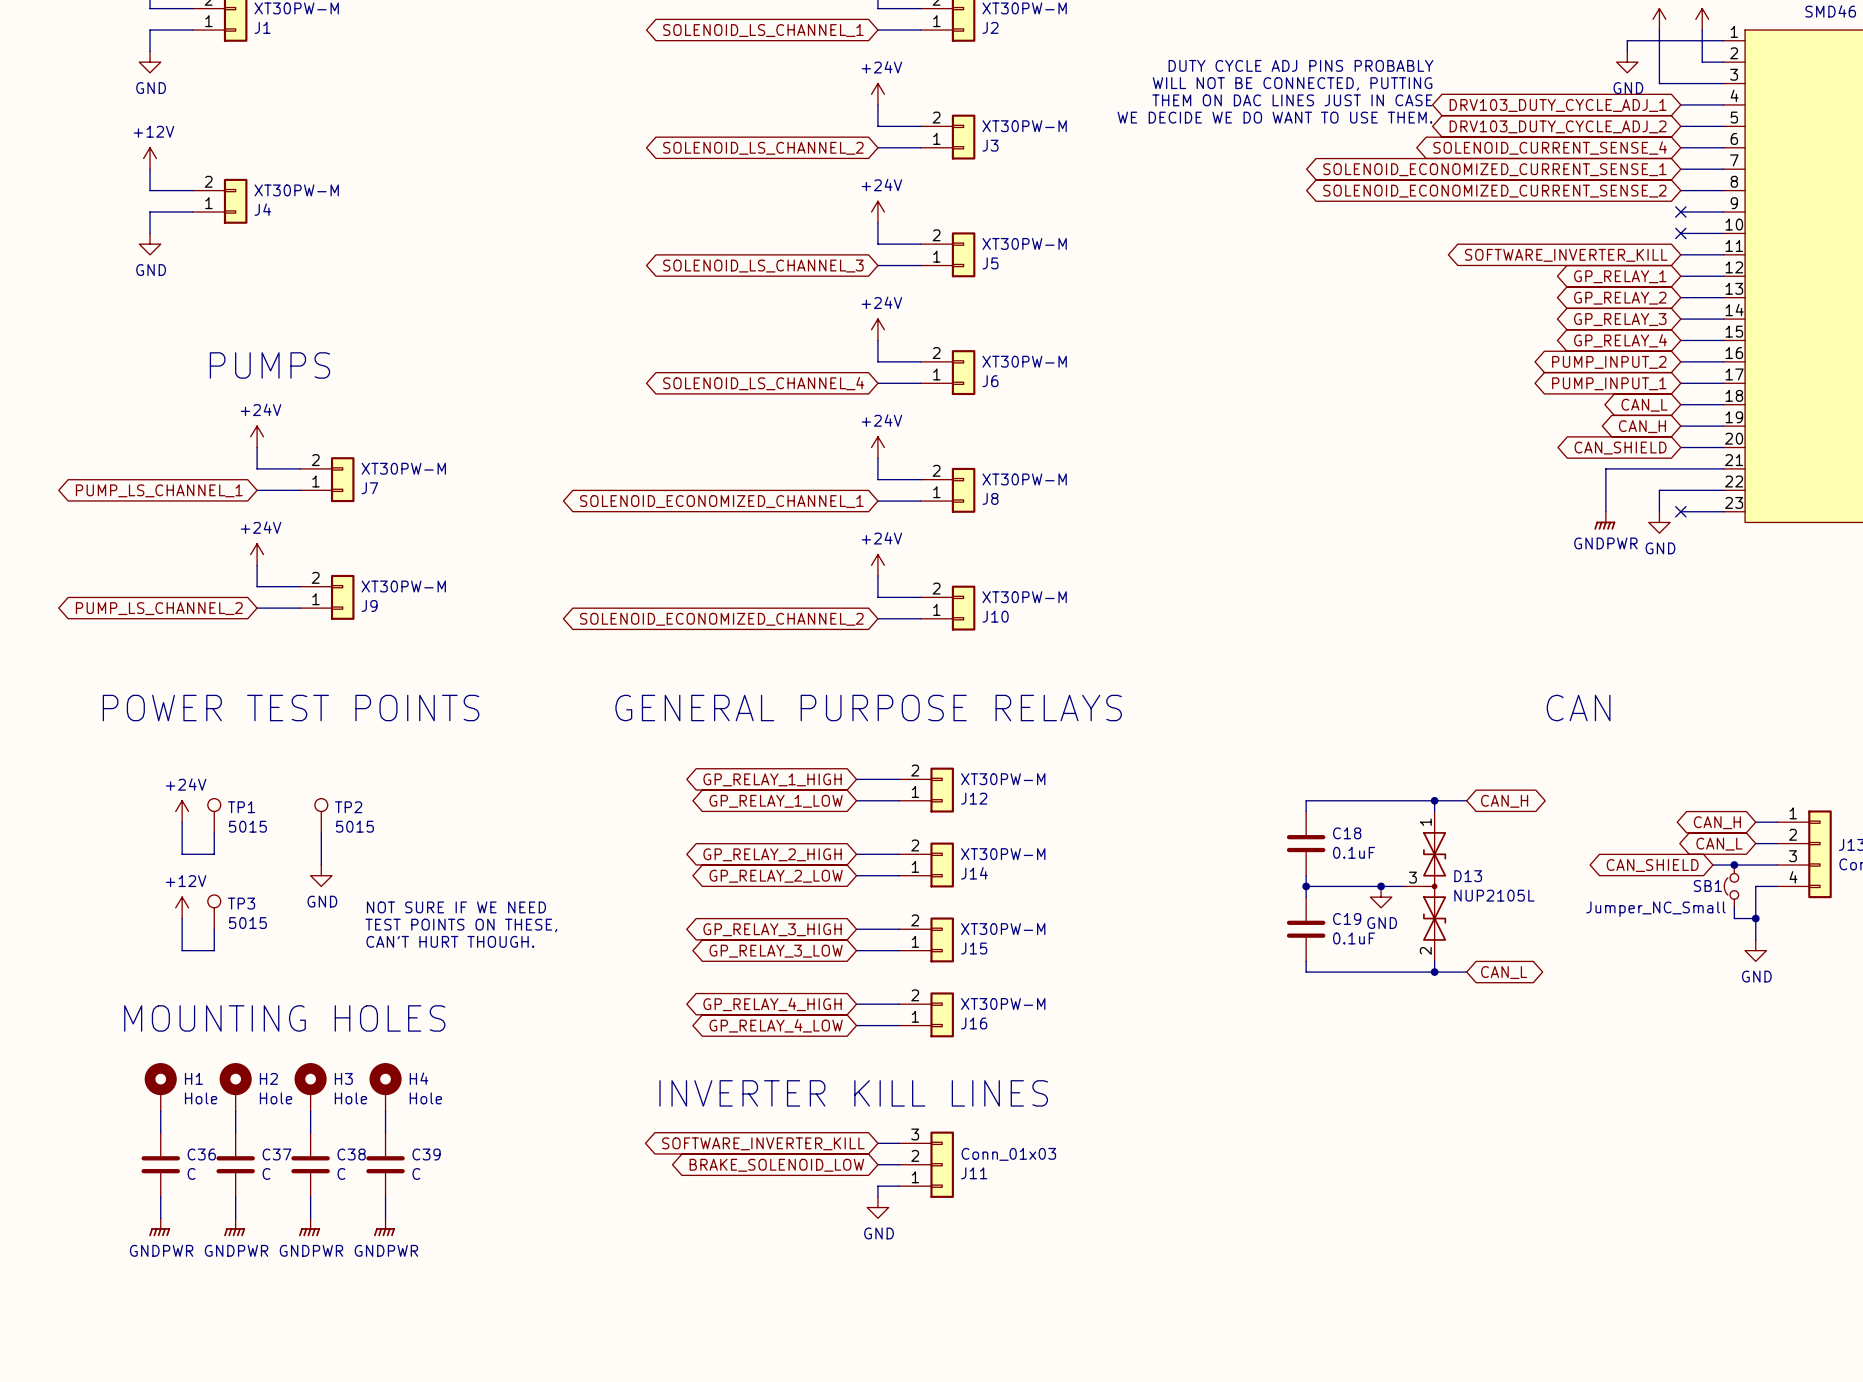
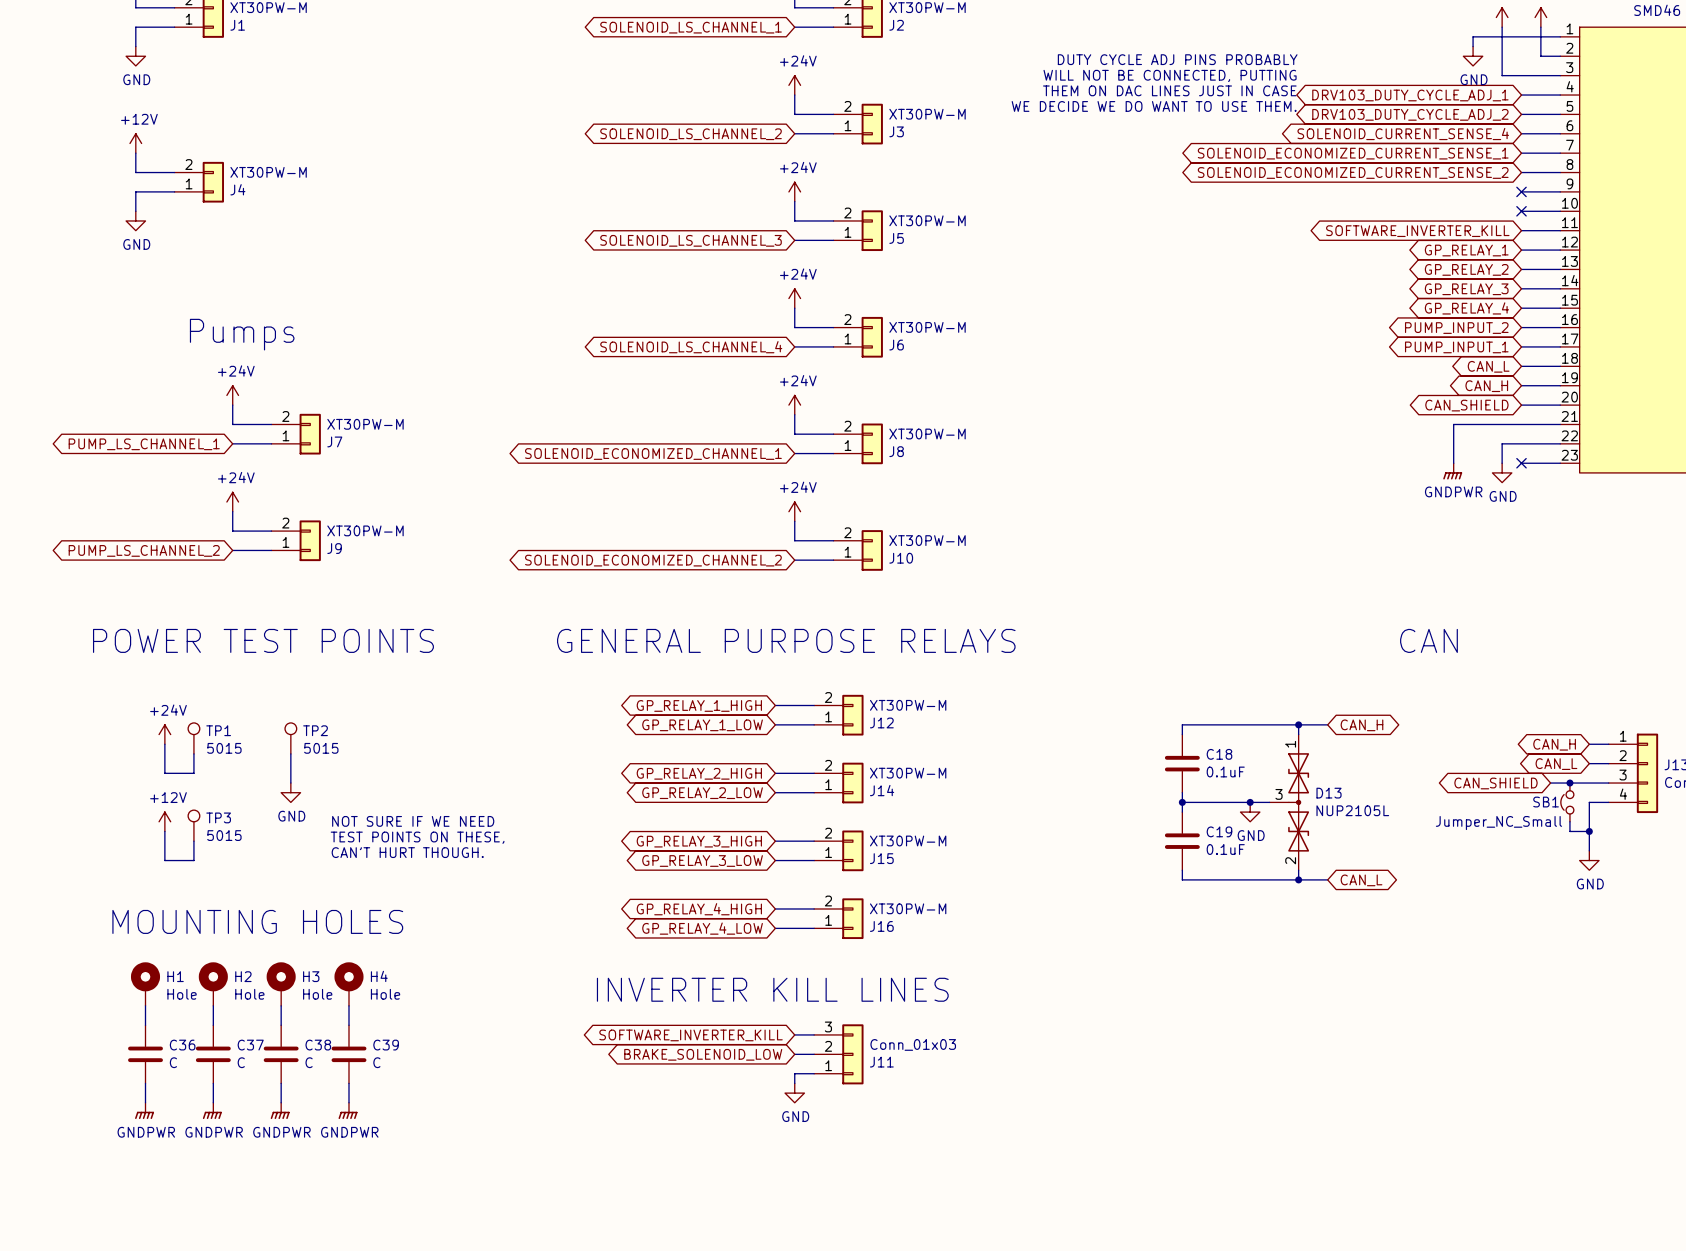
text: PUMPS (269, 365) -> Pumps (242, 334)

